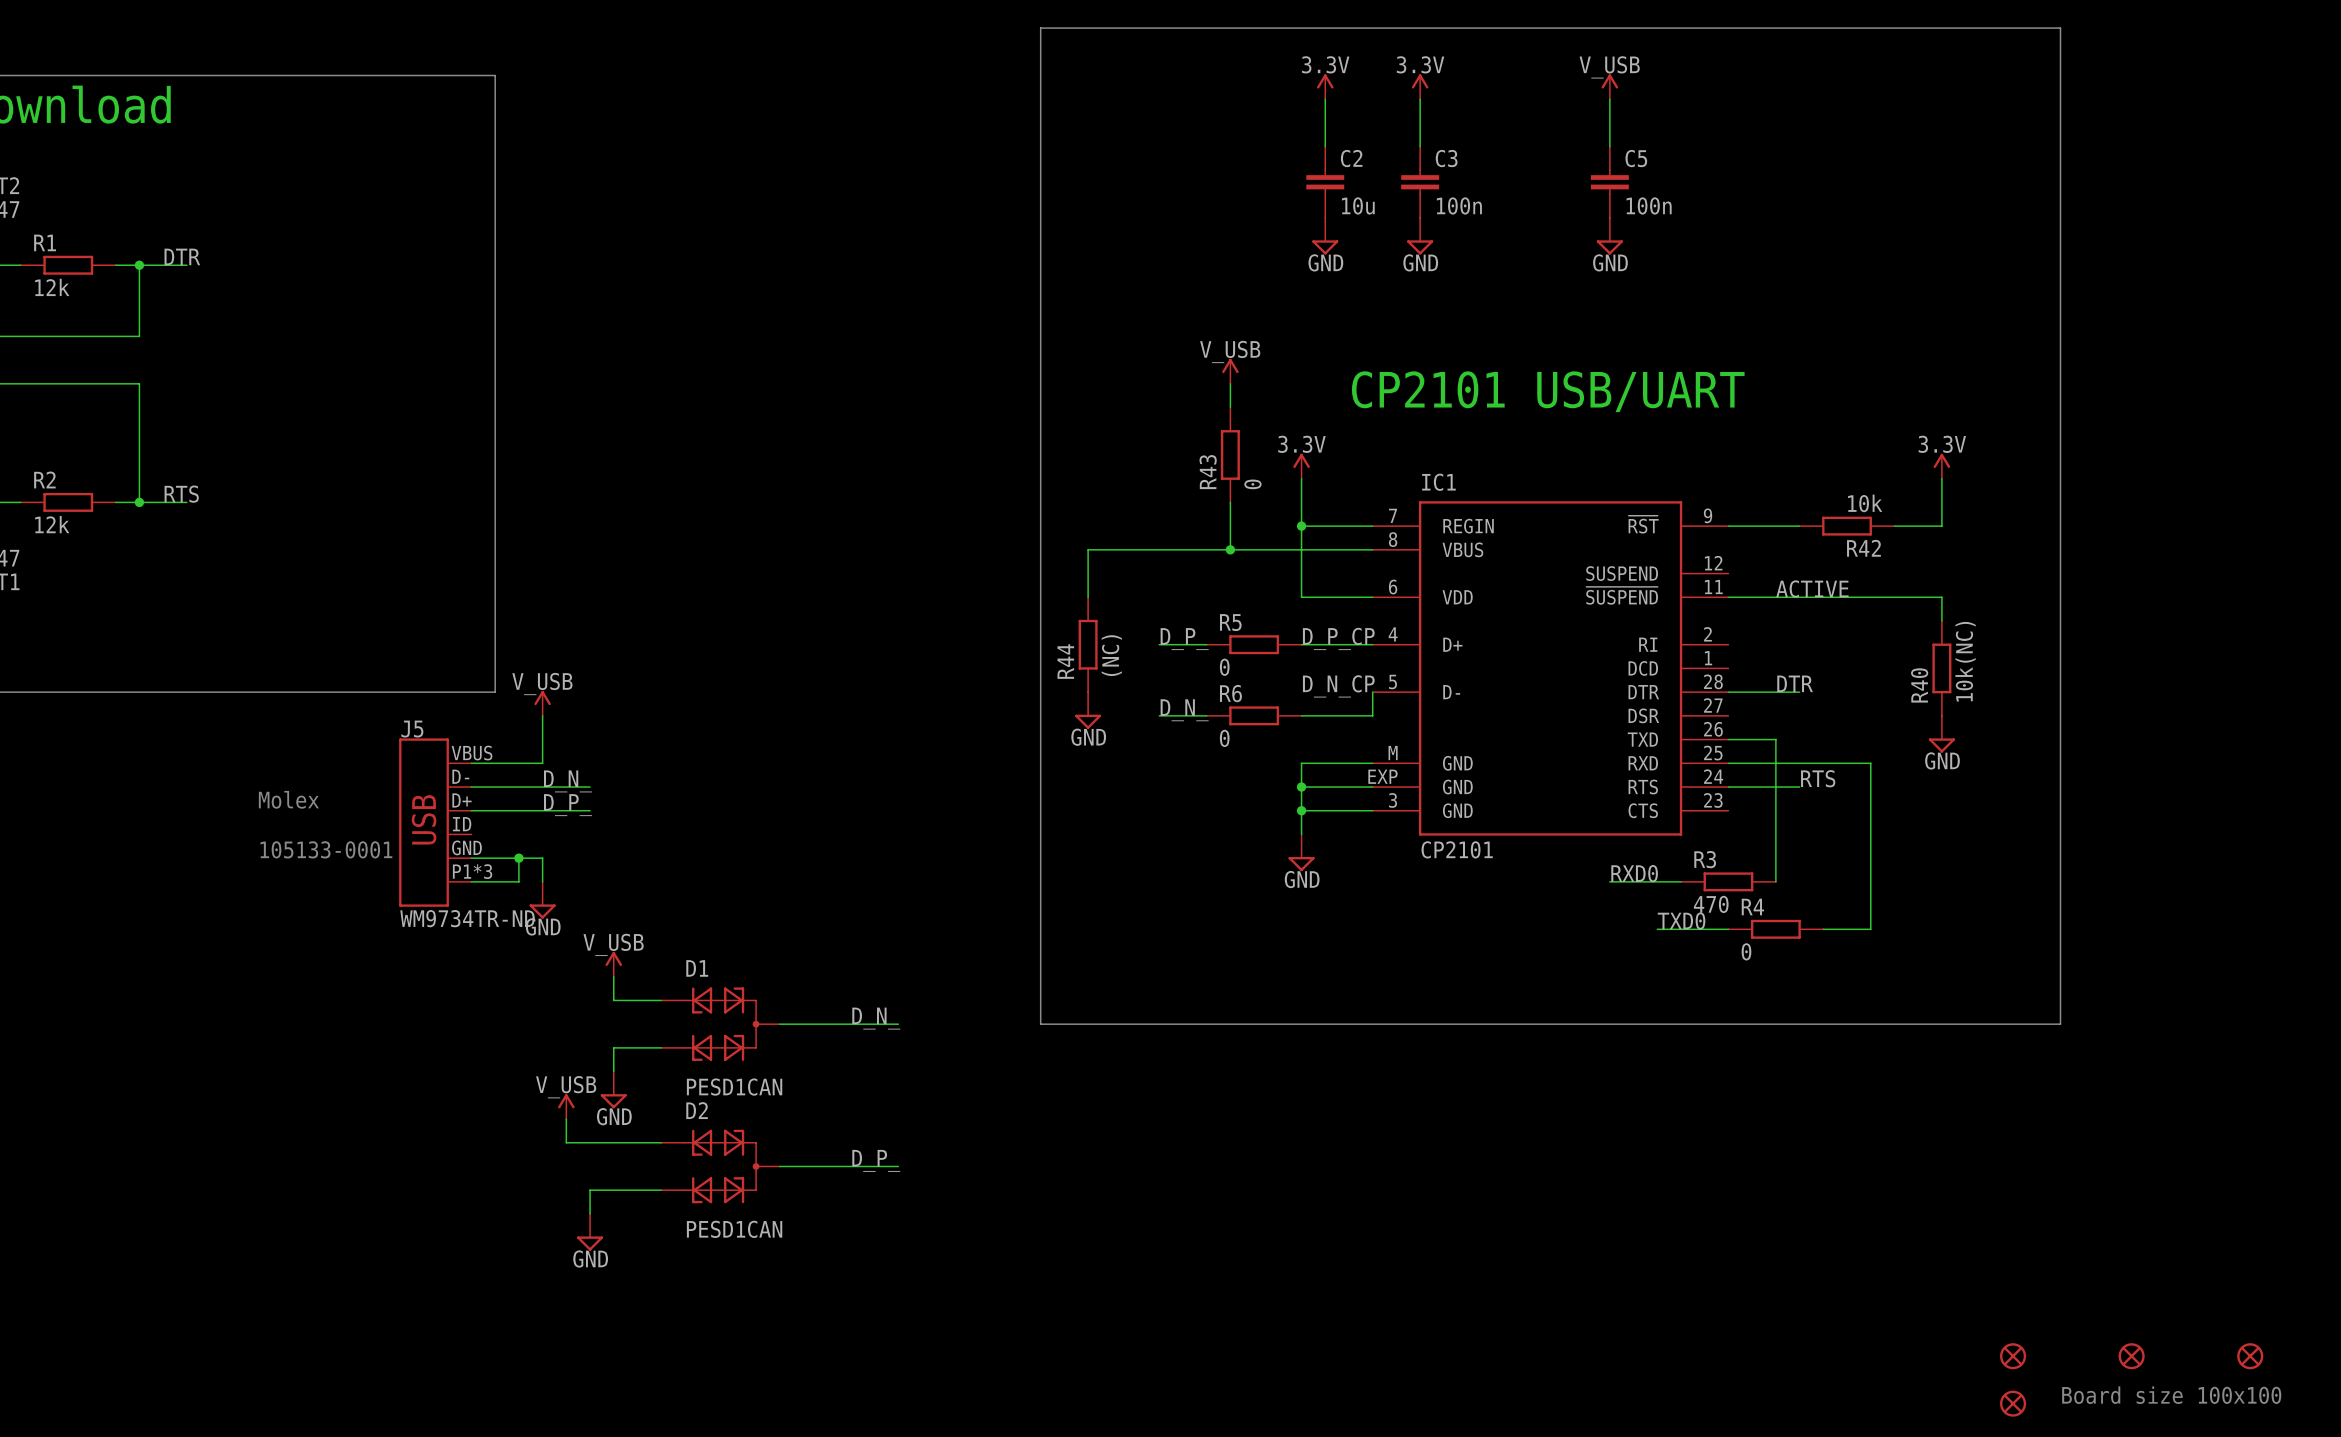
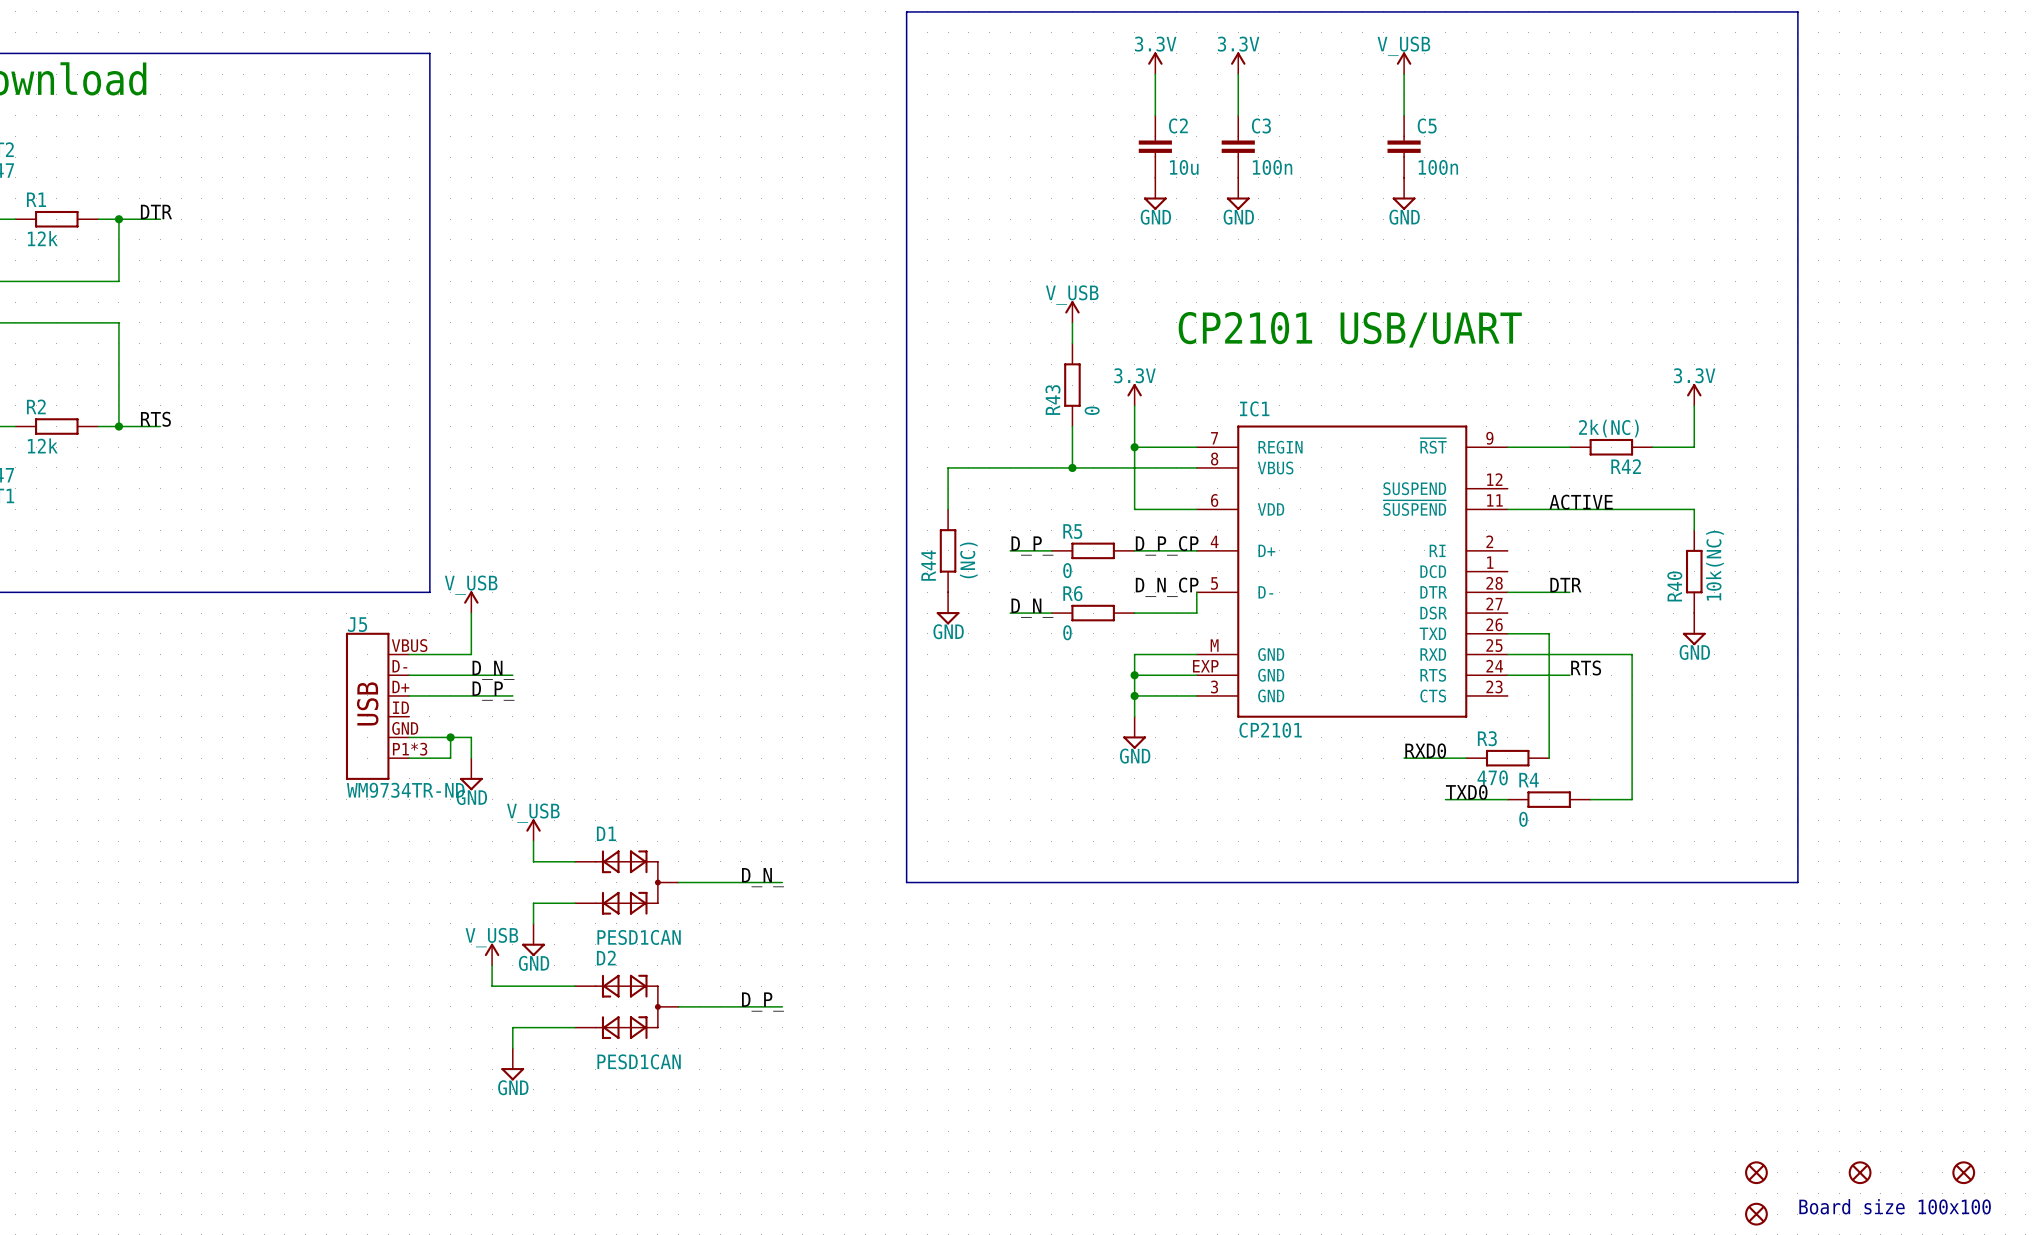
R42 value: 10k (1865, 503) -> 2k(NC) (1608, 428)
text: Molex (288, 799) -> none
text: 105133-0001 (326, 849) -> none

